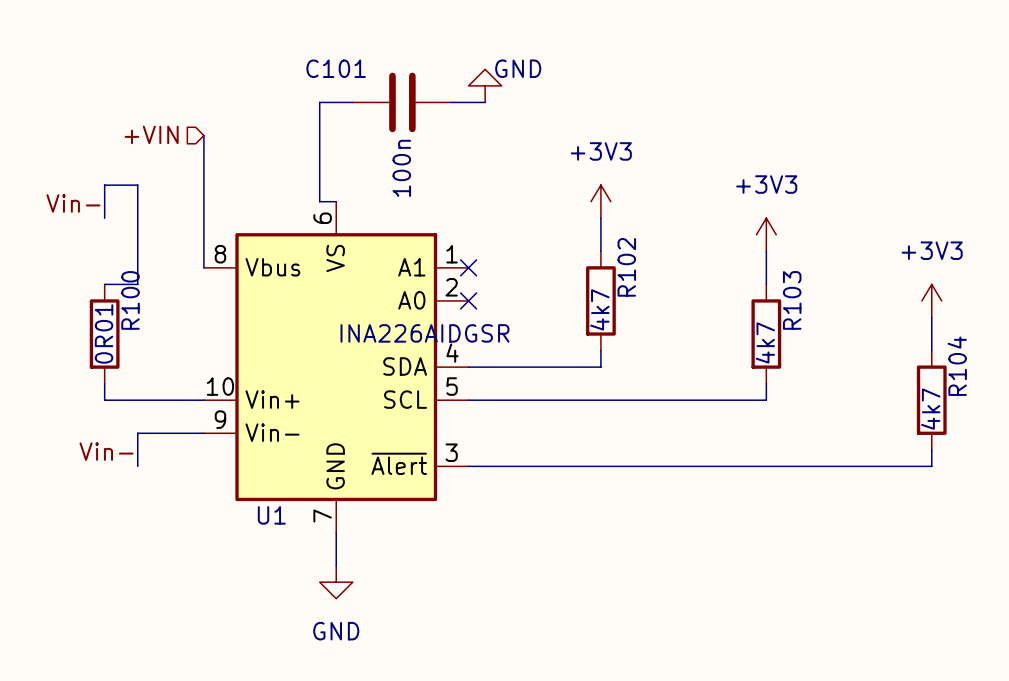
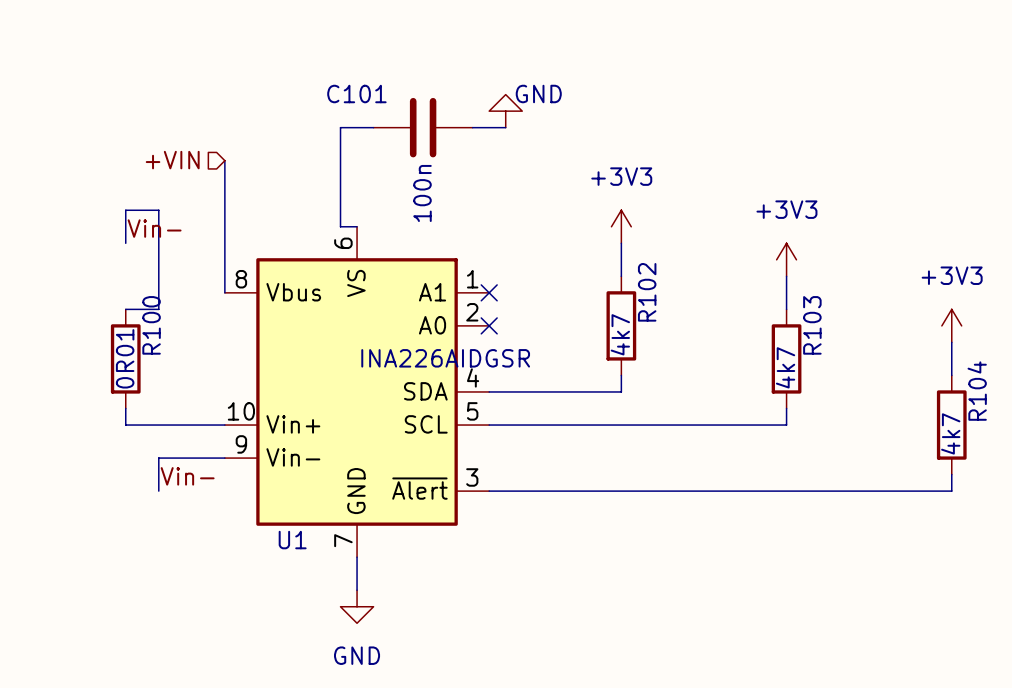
label position: Vin- (73, 203) -> Vin- (154, 228)
label position: Vin- (106, 451) -> Vin- (187, 476)

